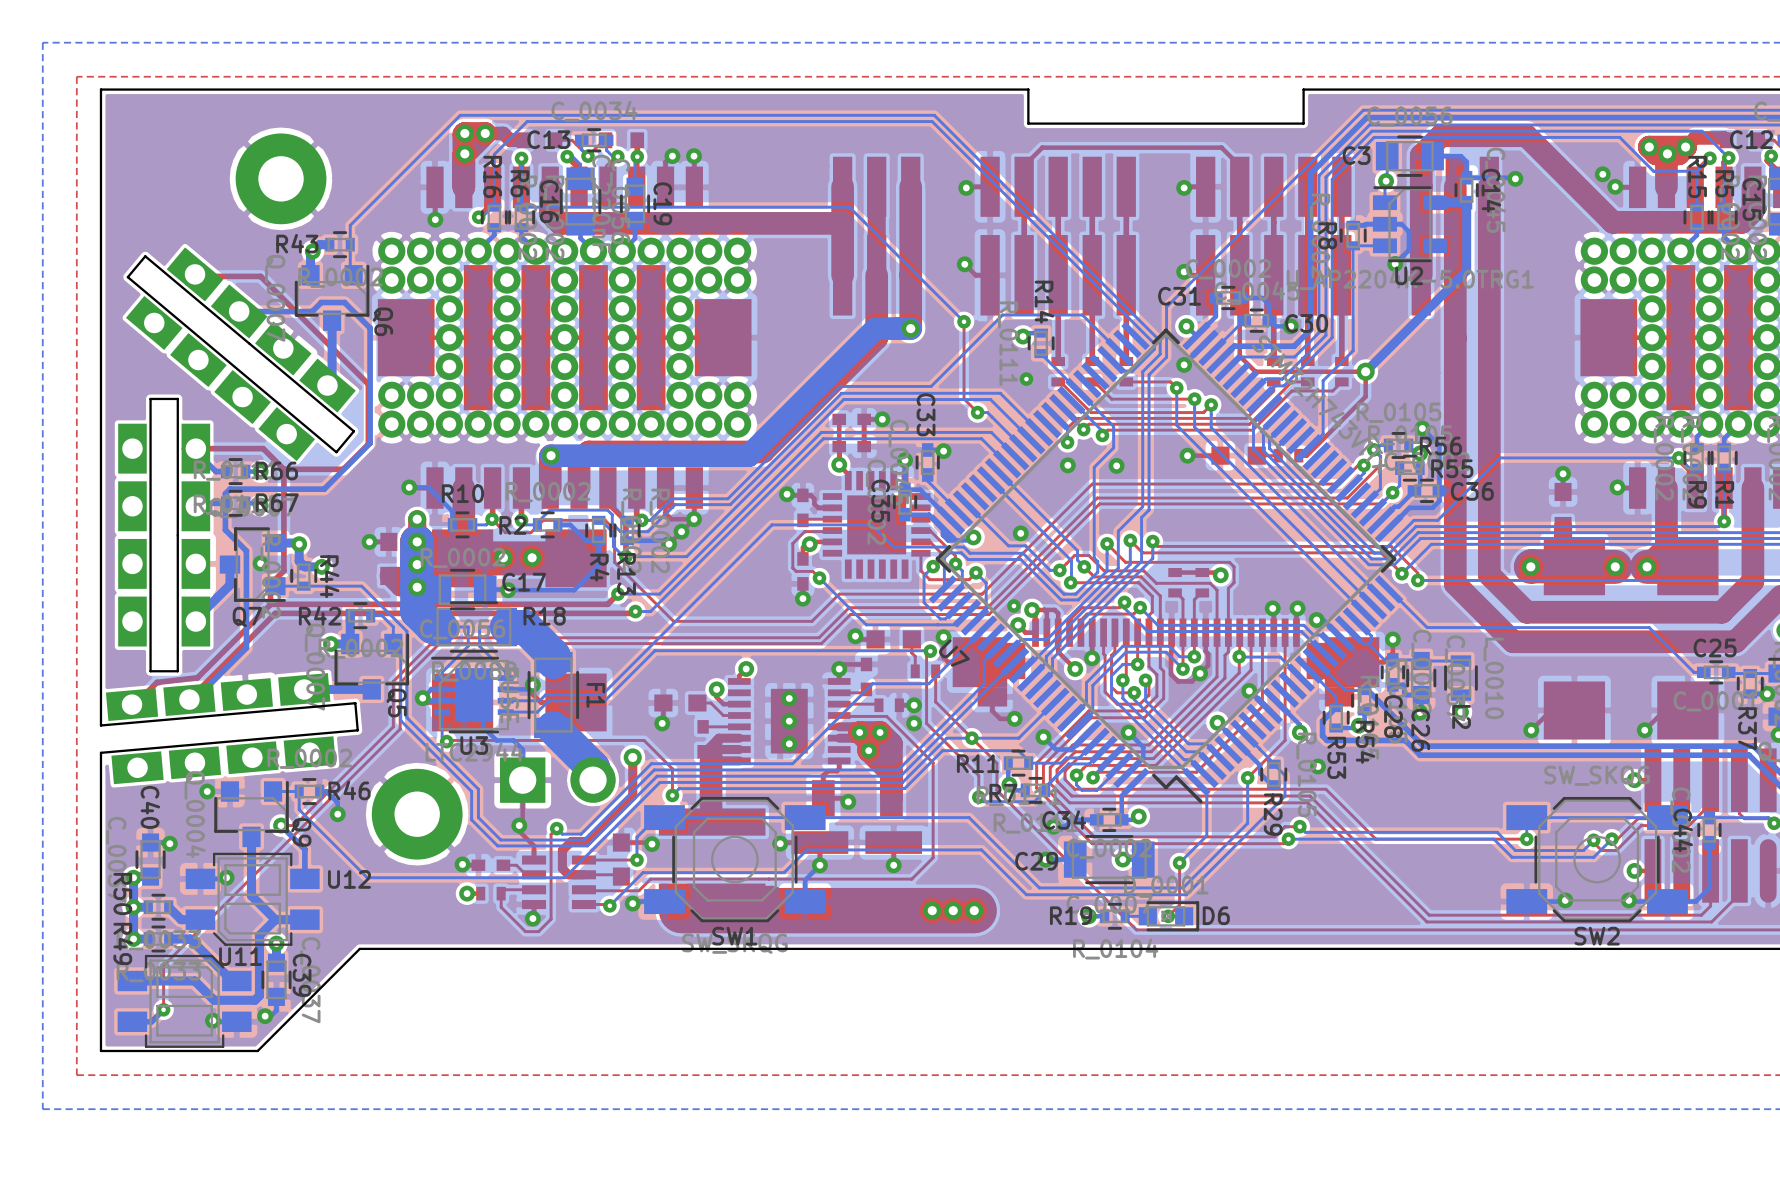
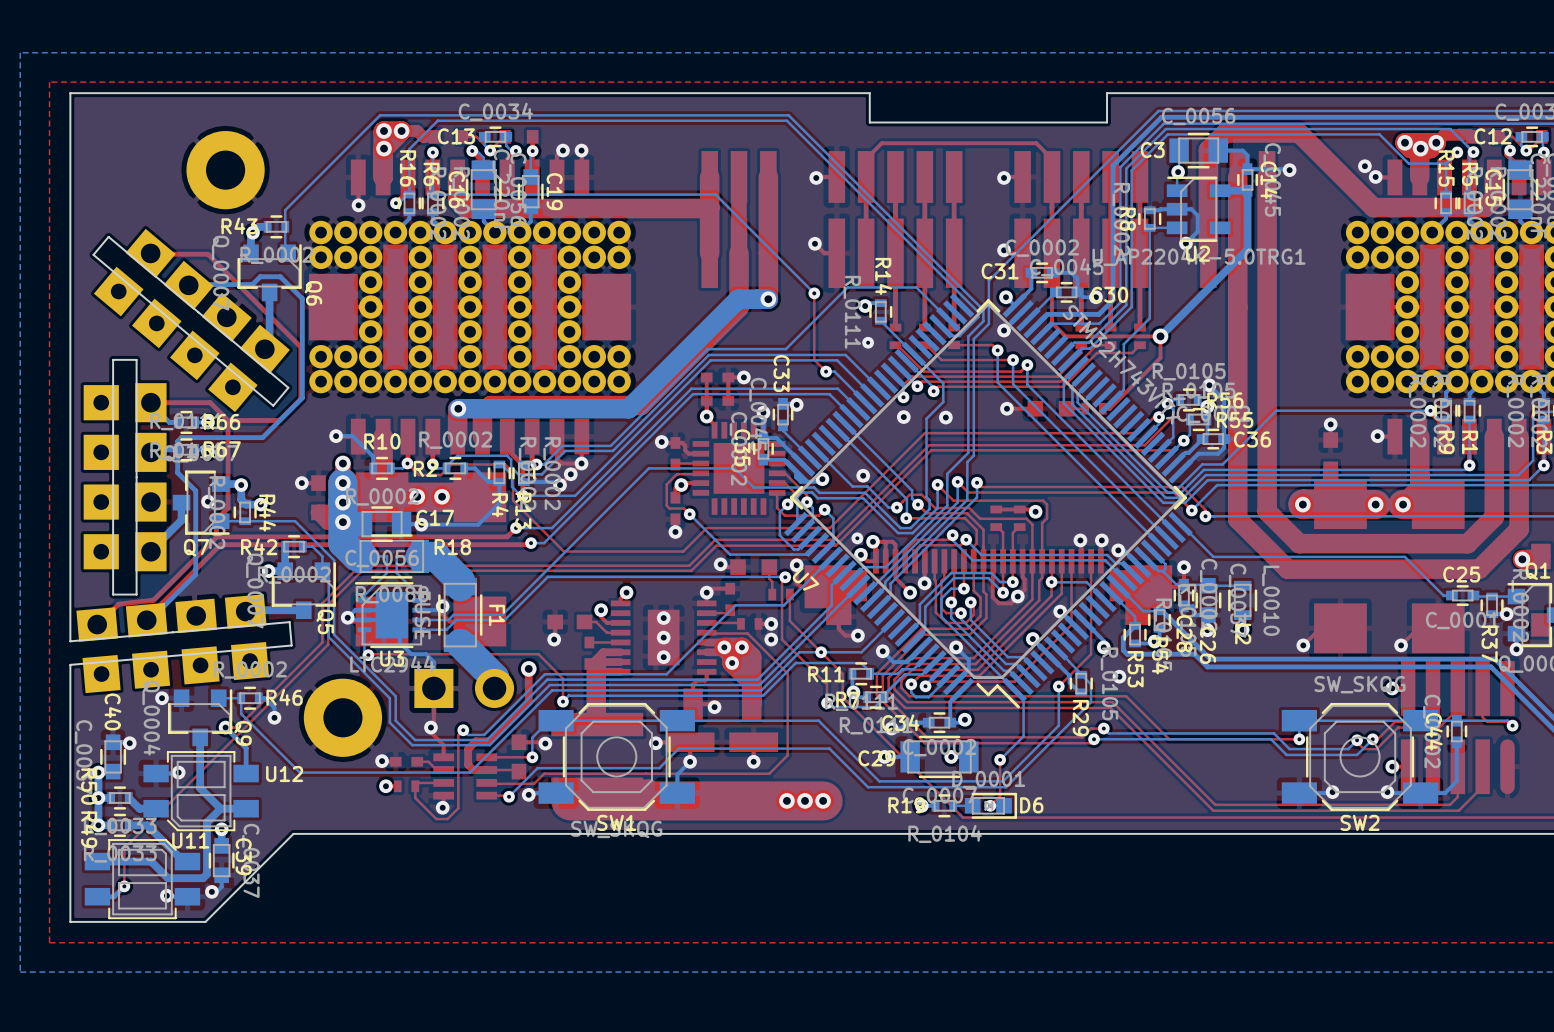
part footprint: [125, 247, 356, 462] -> [93, 228, 290, 413]
part footprint: [118, 423, 211, 647] -> [83, 383, 167, 572]
part footprint: [105, 673, 336, 785] -> [76, 594, 270, 694]

